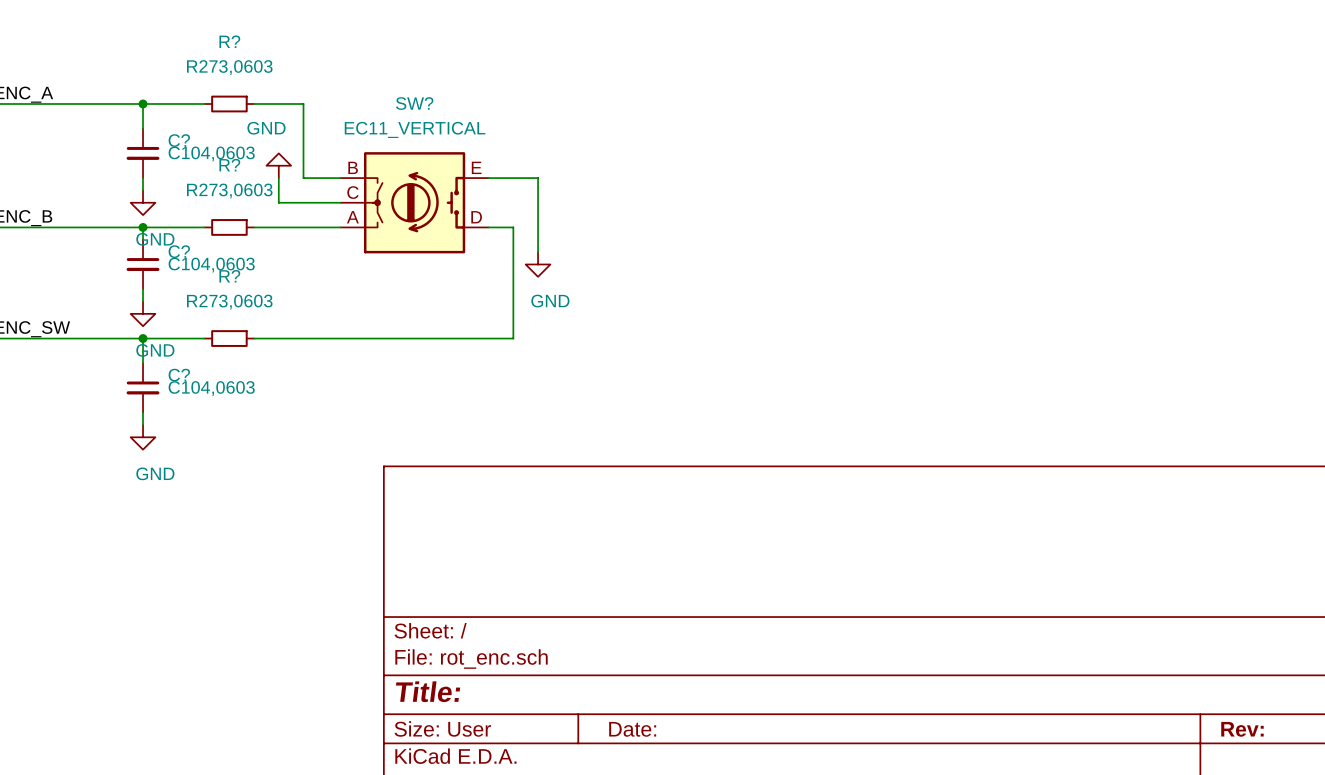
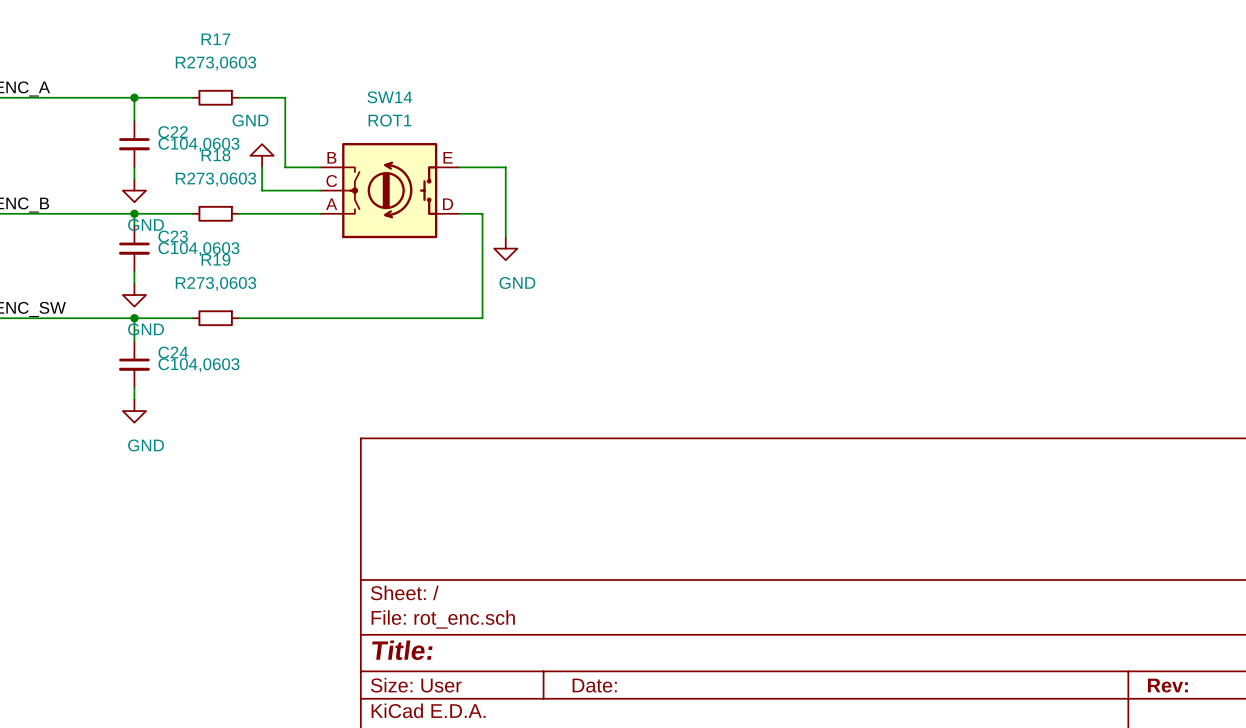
R? name: R? (229, 41) -> R17 (215, 39)
SW? name: SW? (414, 103) -> SW14 (389, 97)
SW? value: EC11_VERTICAL (415, 129) -> ROT1 (389, 120)
C? name: C? (179, 140) -> C22 (173, 132)
R? name: R? (229, 165) -> R18 (215, 155)
C? name: C? (179, 251) -> C23 (173, 236)
R? name: R? (229, 276) -> R19 (215, 259)
C? name: C? (179, 375) -> C24 (173, 352)

